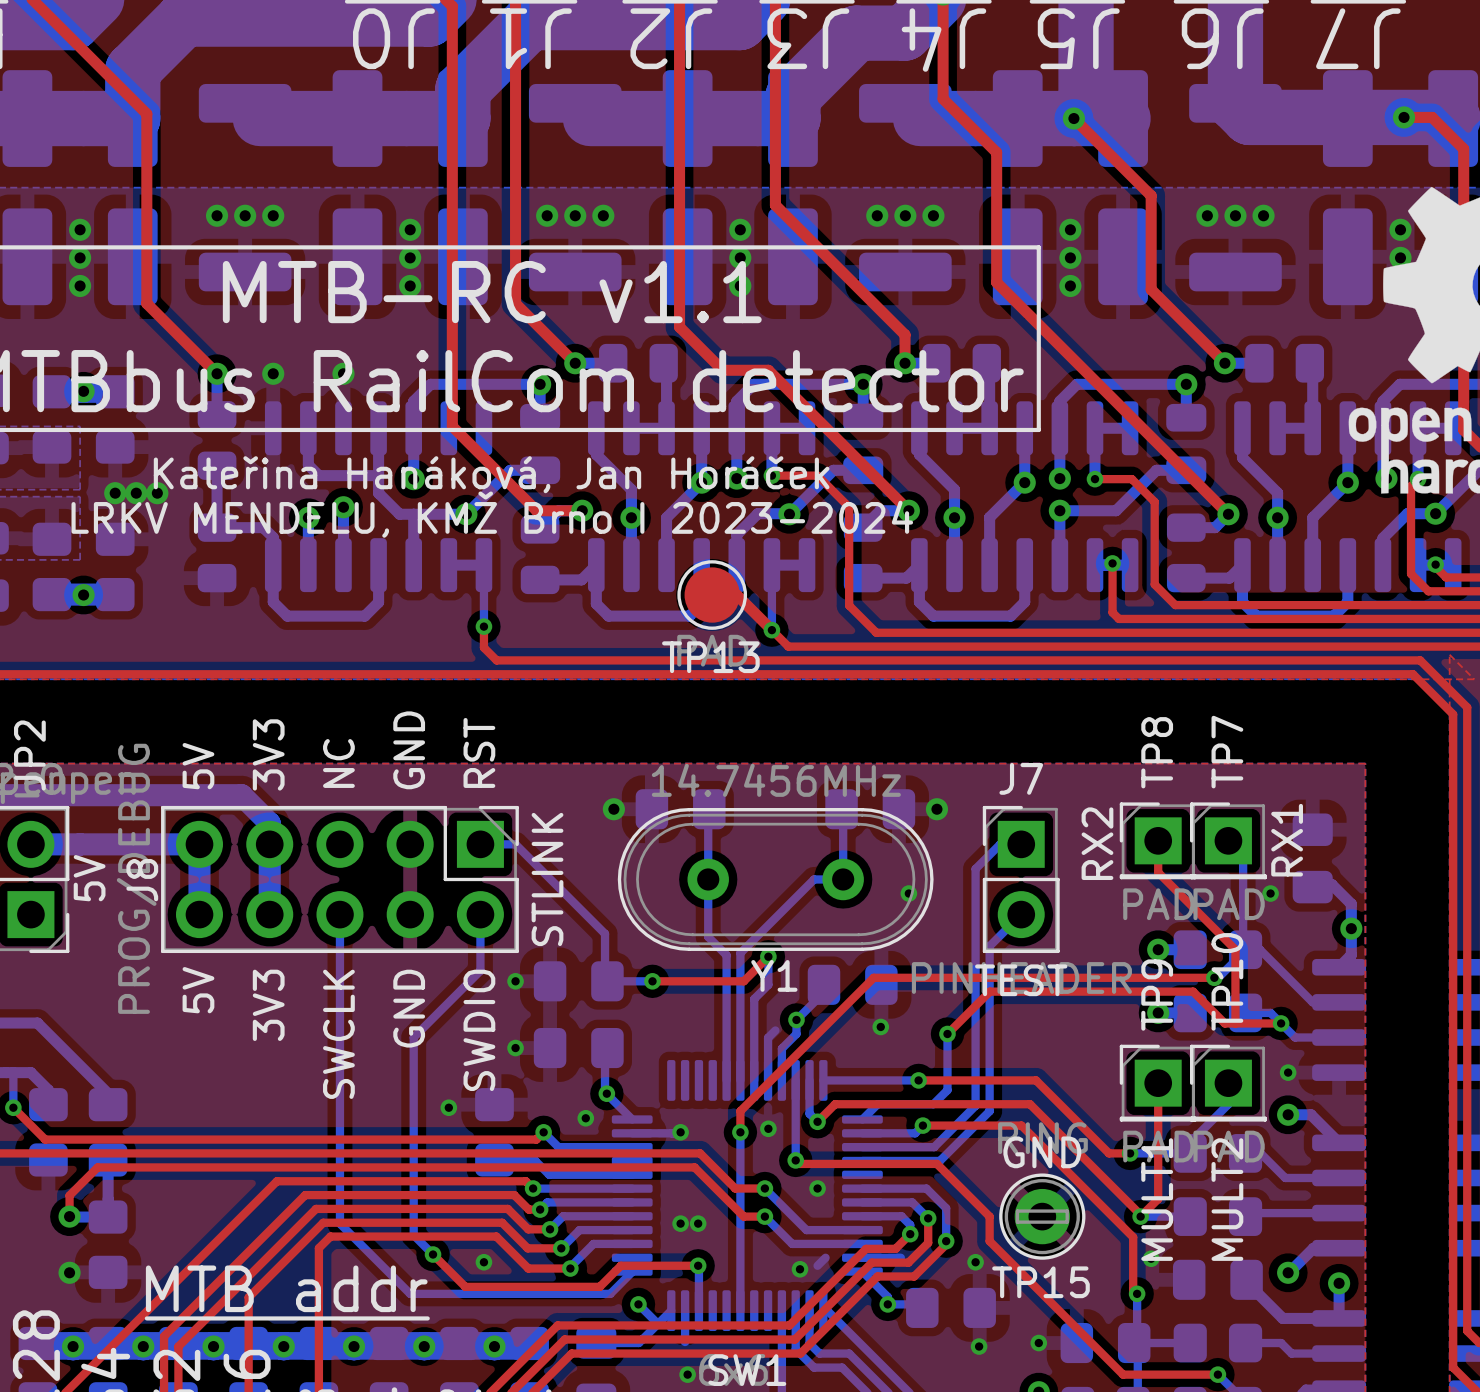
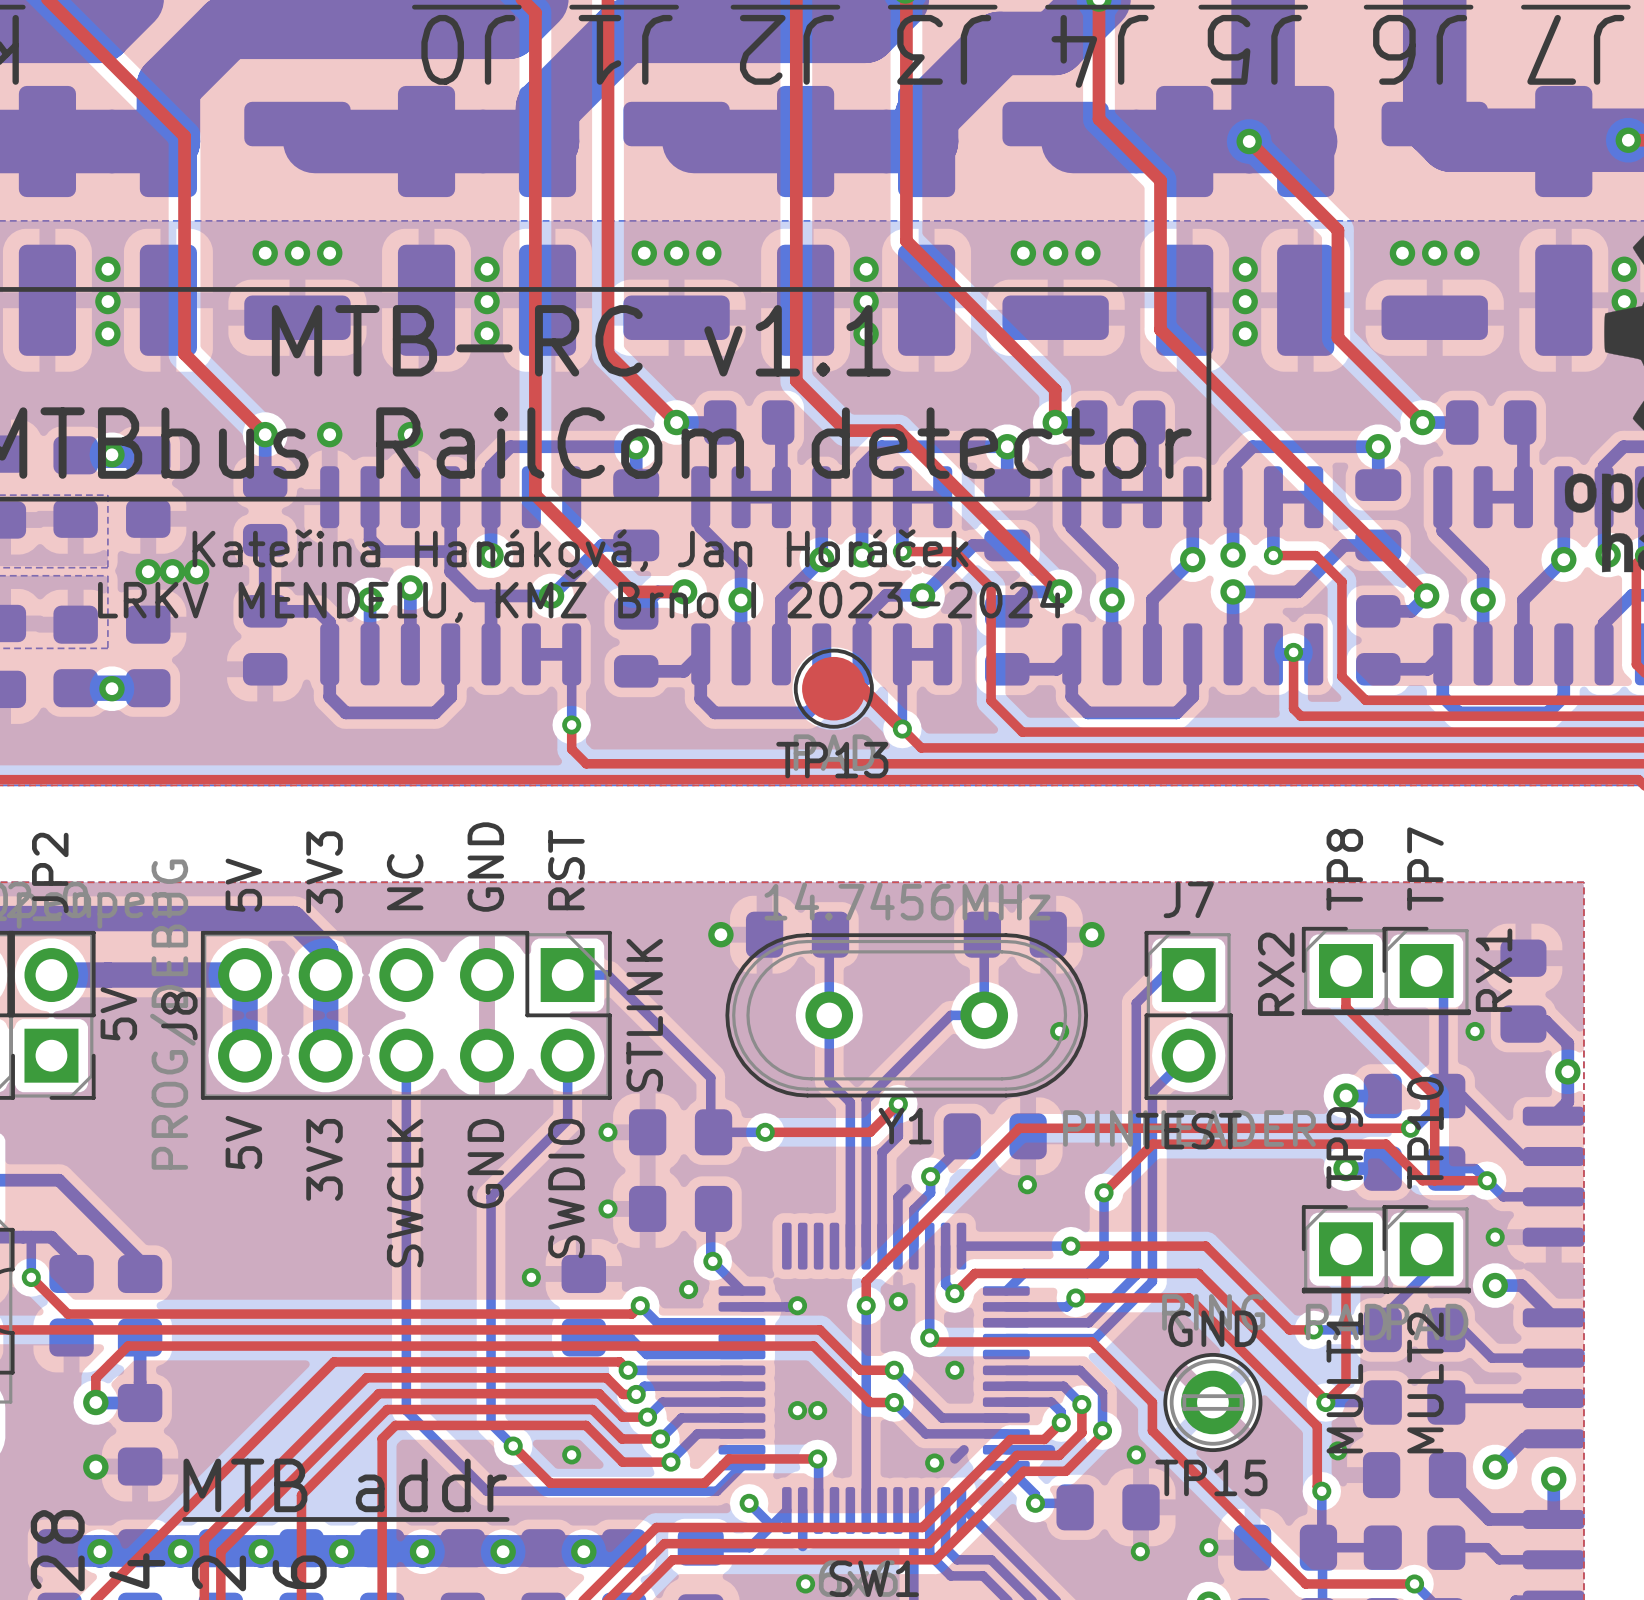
TP8 value: PAD (1158, 904) -> none
TP7 value: PAD (1229, 904) -> none

